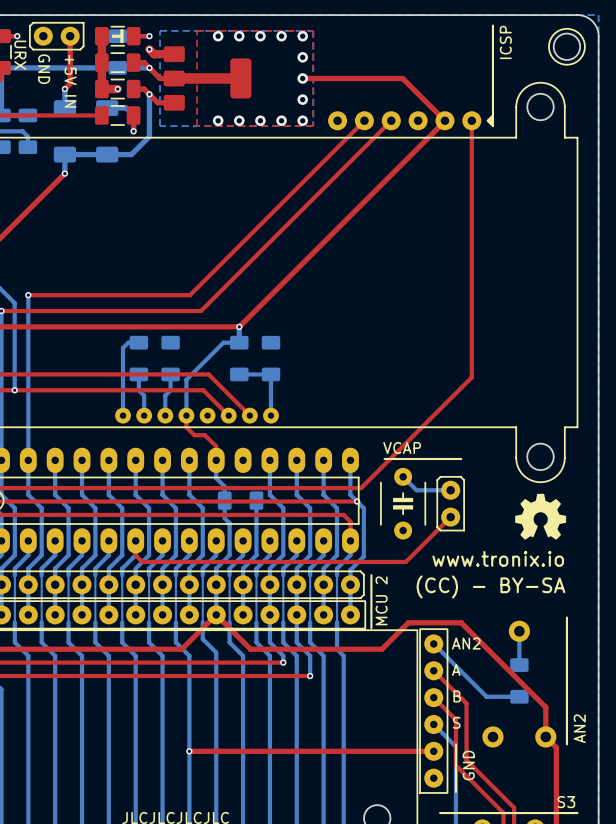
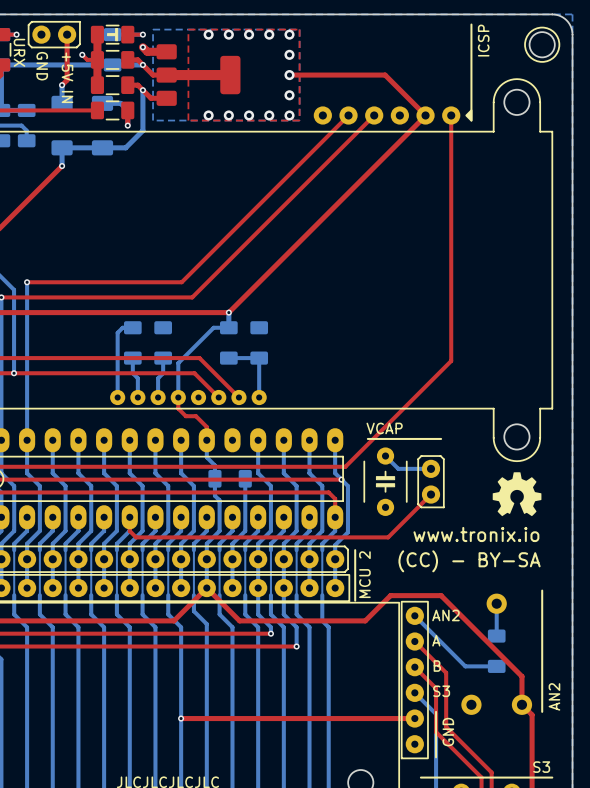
top track: none -> (82, 54) (87, 59) (97, 59)
top track: (101, 89) (117, 89) -> none
via position: (117, 89) -> (82, 54)
text: S (456, 722) -> S3 (441, 691)

